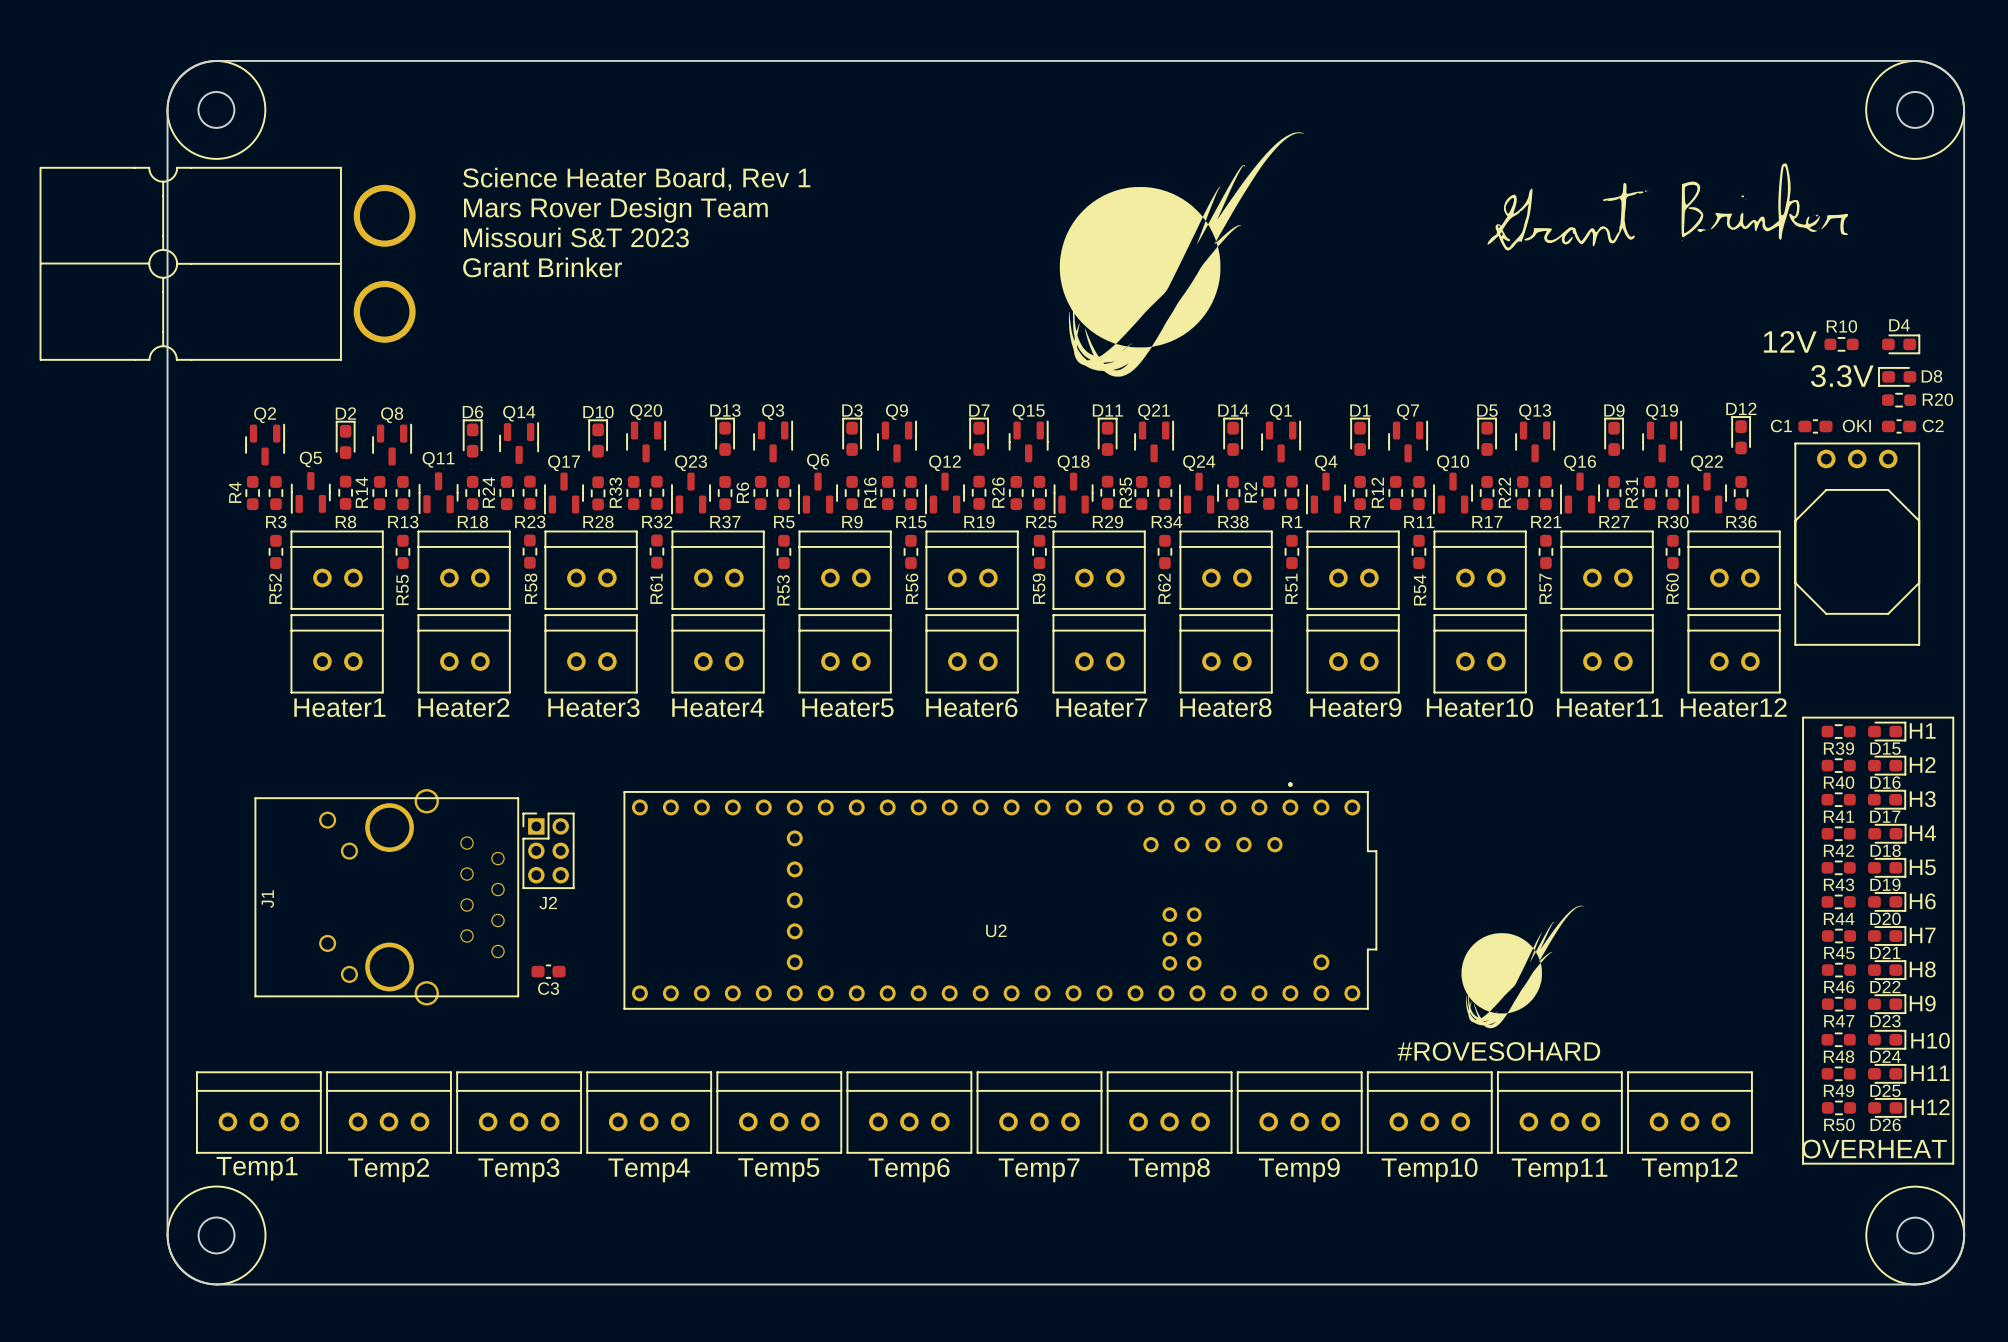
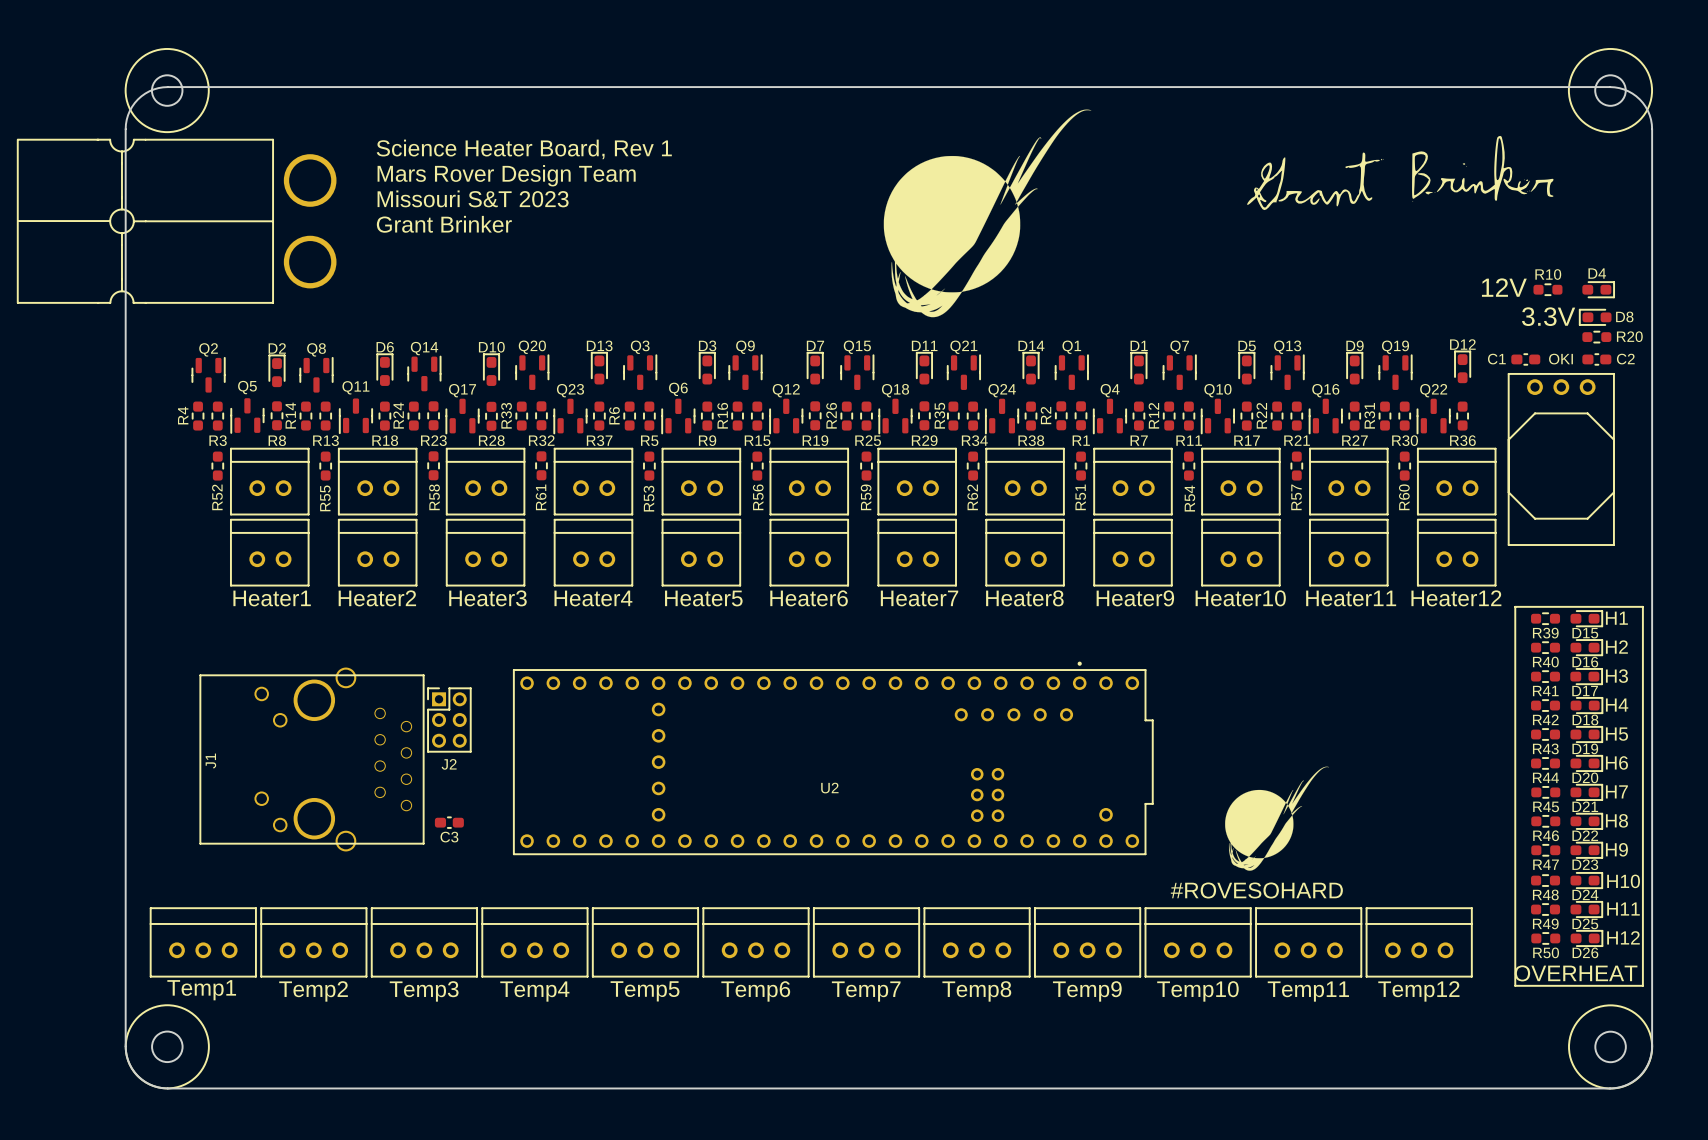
board edge: (167, 155) (167, 104) (172, 88) (182, 75) (190, 68) (206, 62) (217, 60) (1914, 60) (1925, 62) (1940, 68) (1949, 75) (1959, 88) (1963, 104) (1964, 155) -> (125, 129) (129, 110) (138, 99) (149, 91) (167, 87) (1610, 87) (1623, 89) (1639, 99) (1647, 110) (1652, 129)

